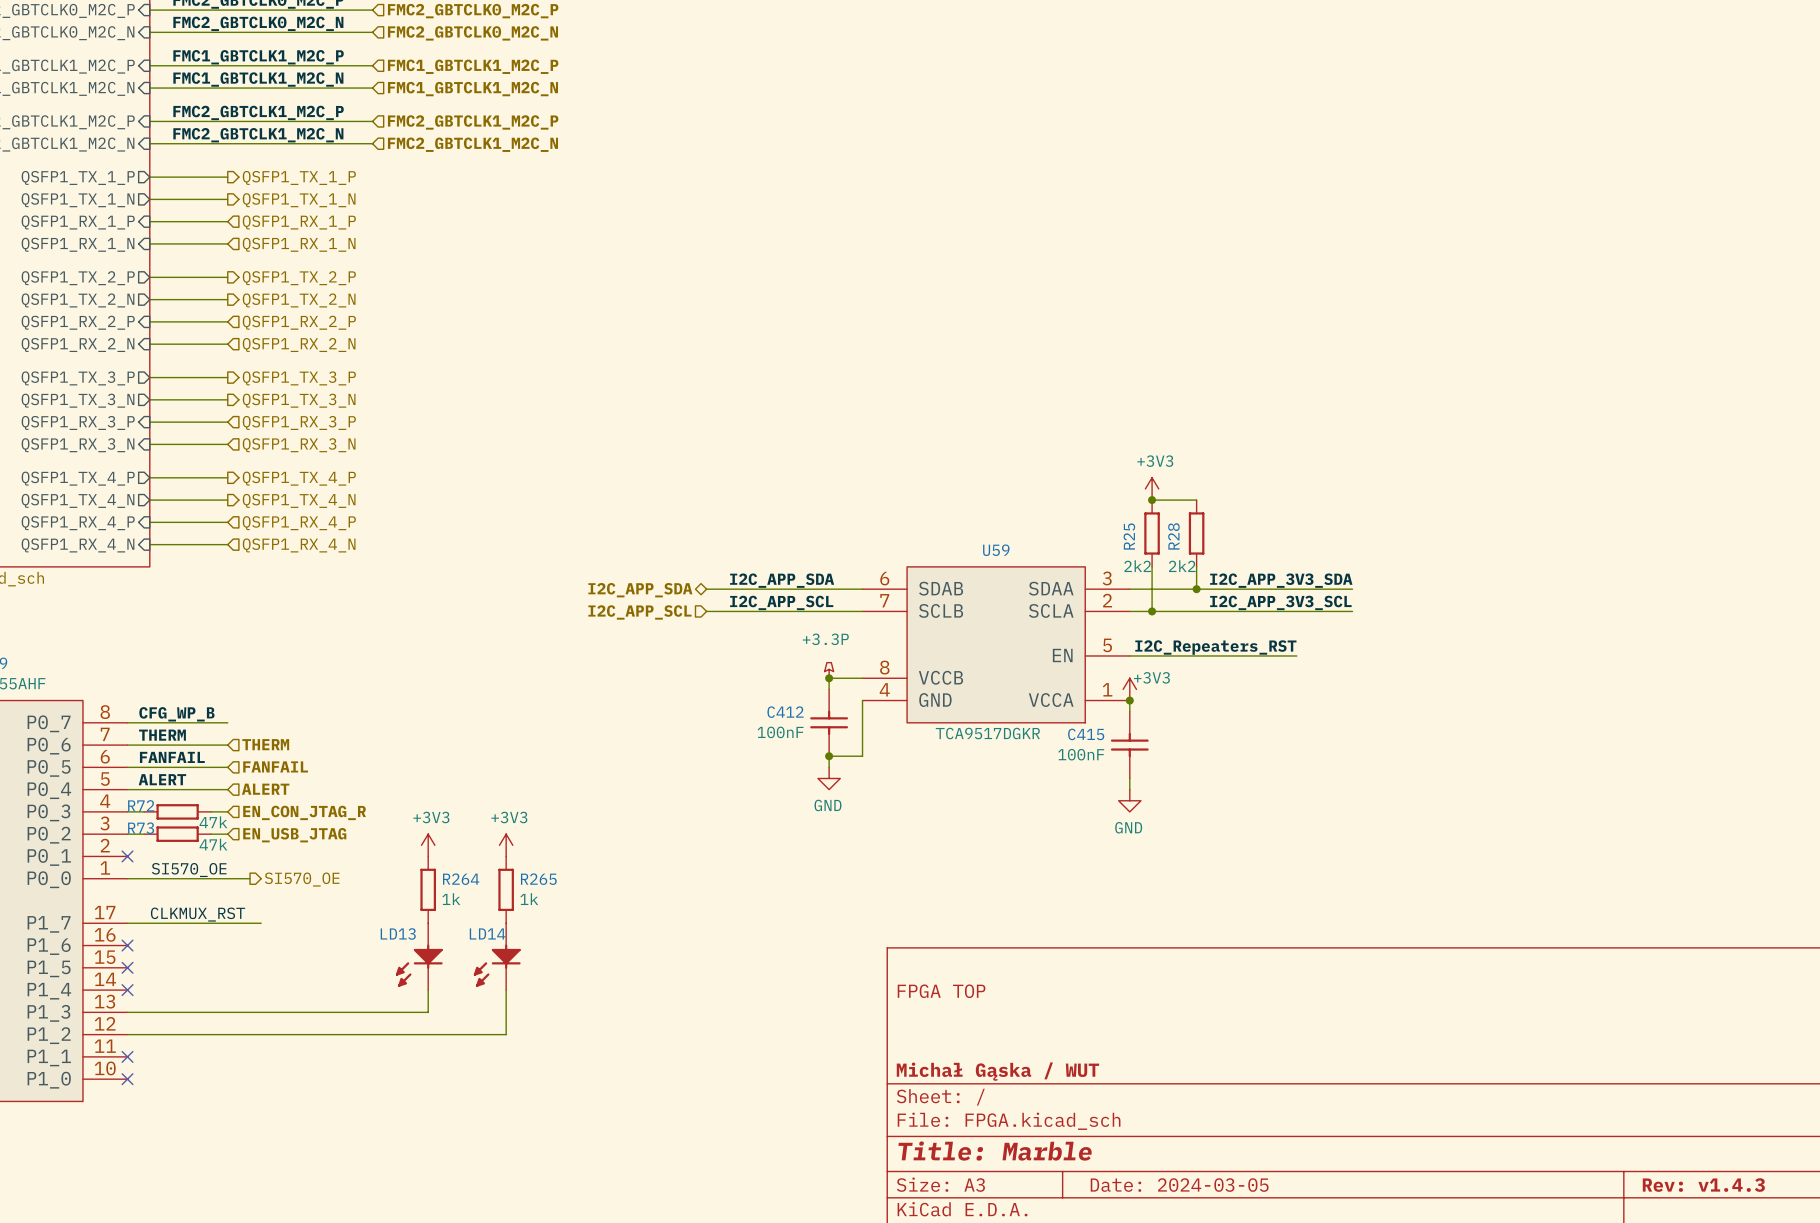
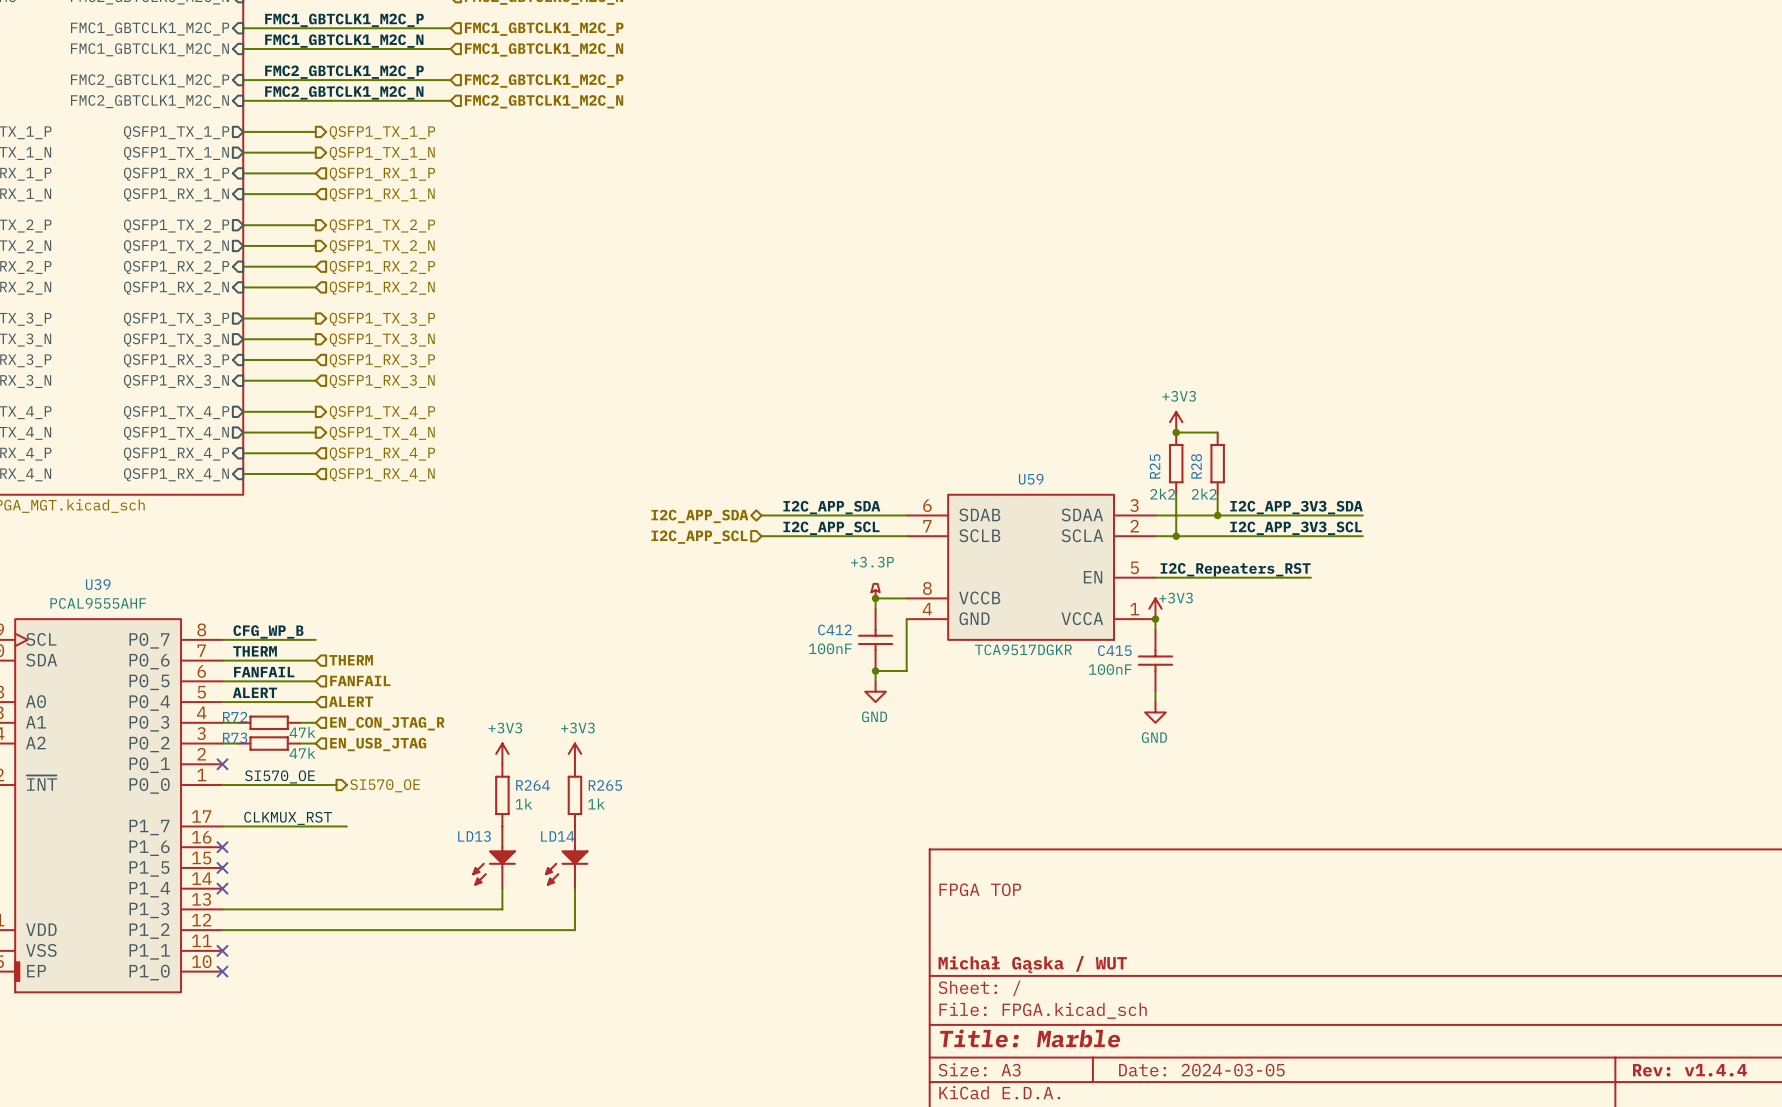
title block: Rev: v1.4.3 (1703, 1185) -> Rev: v1.4.4 (1689, 1070)

